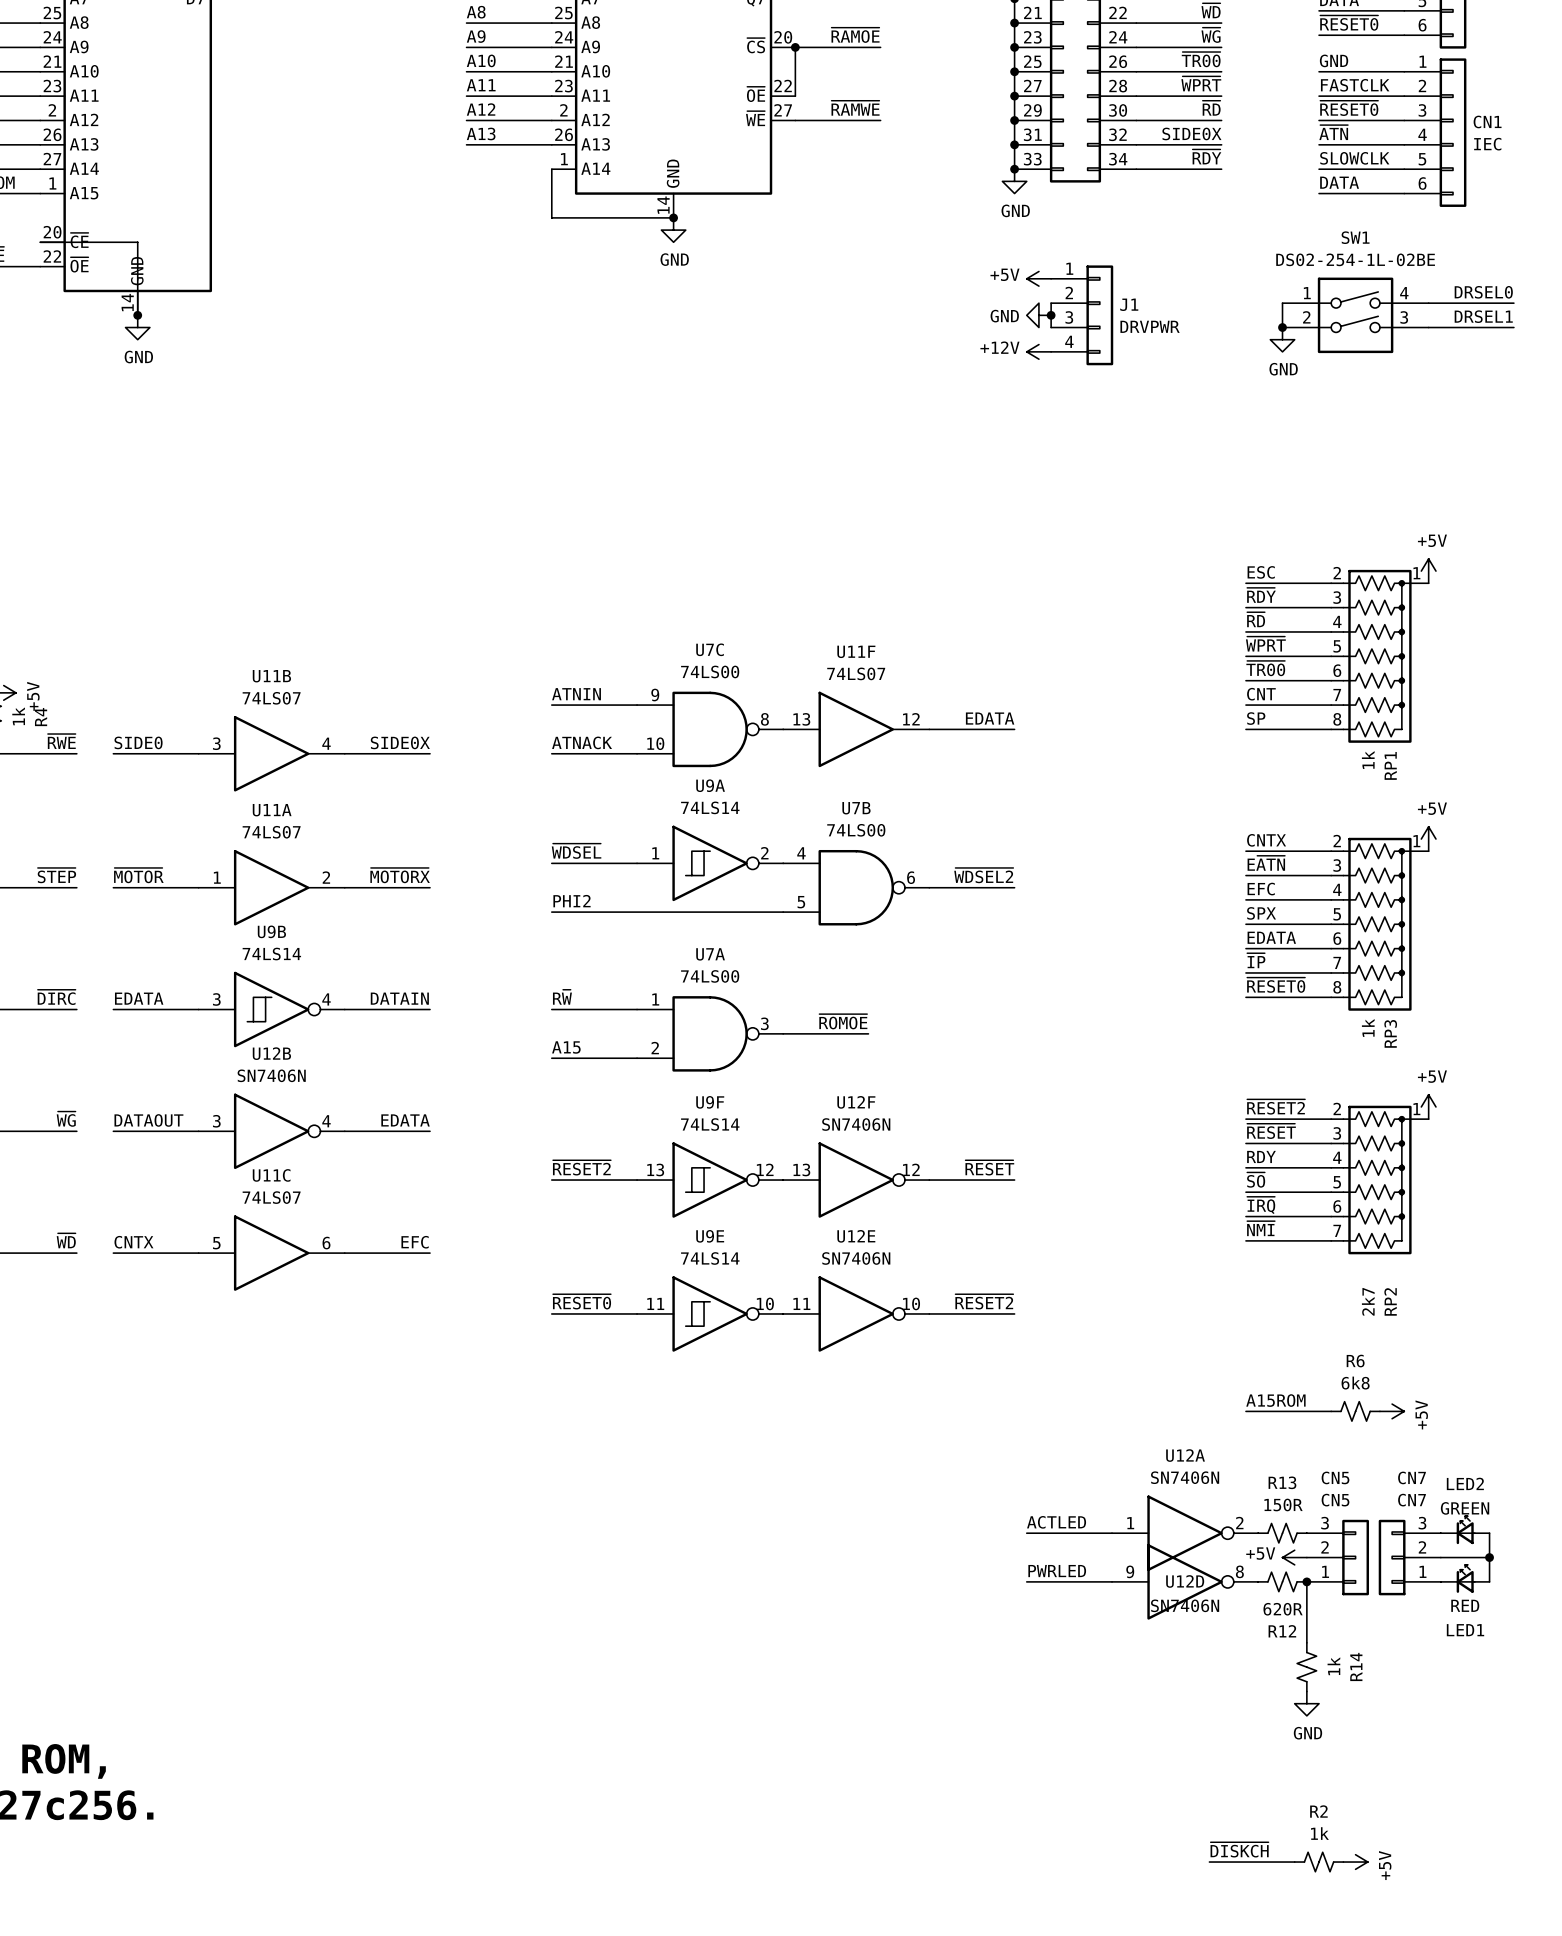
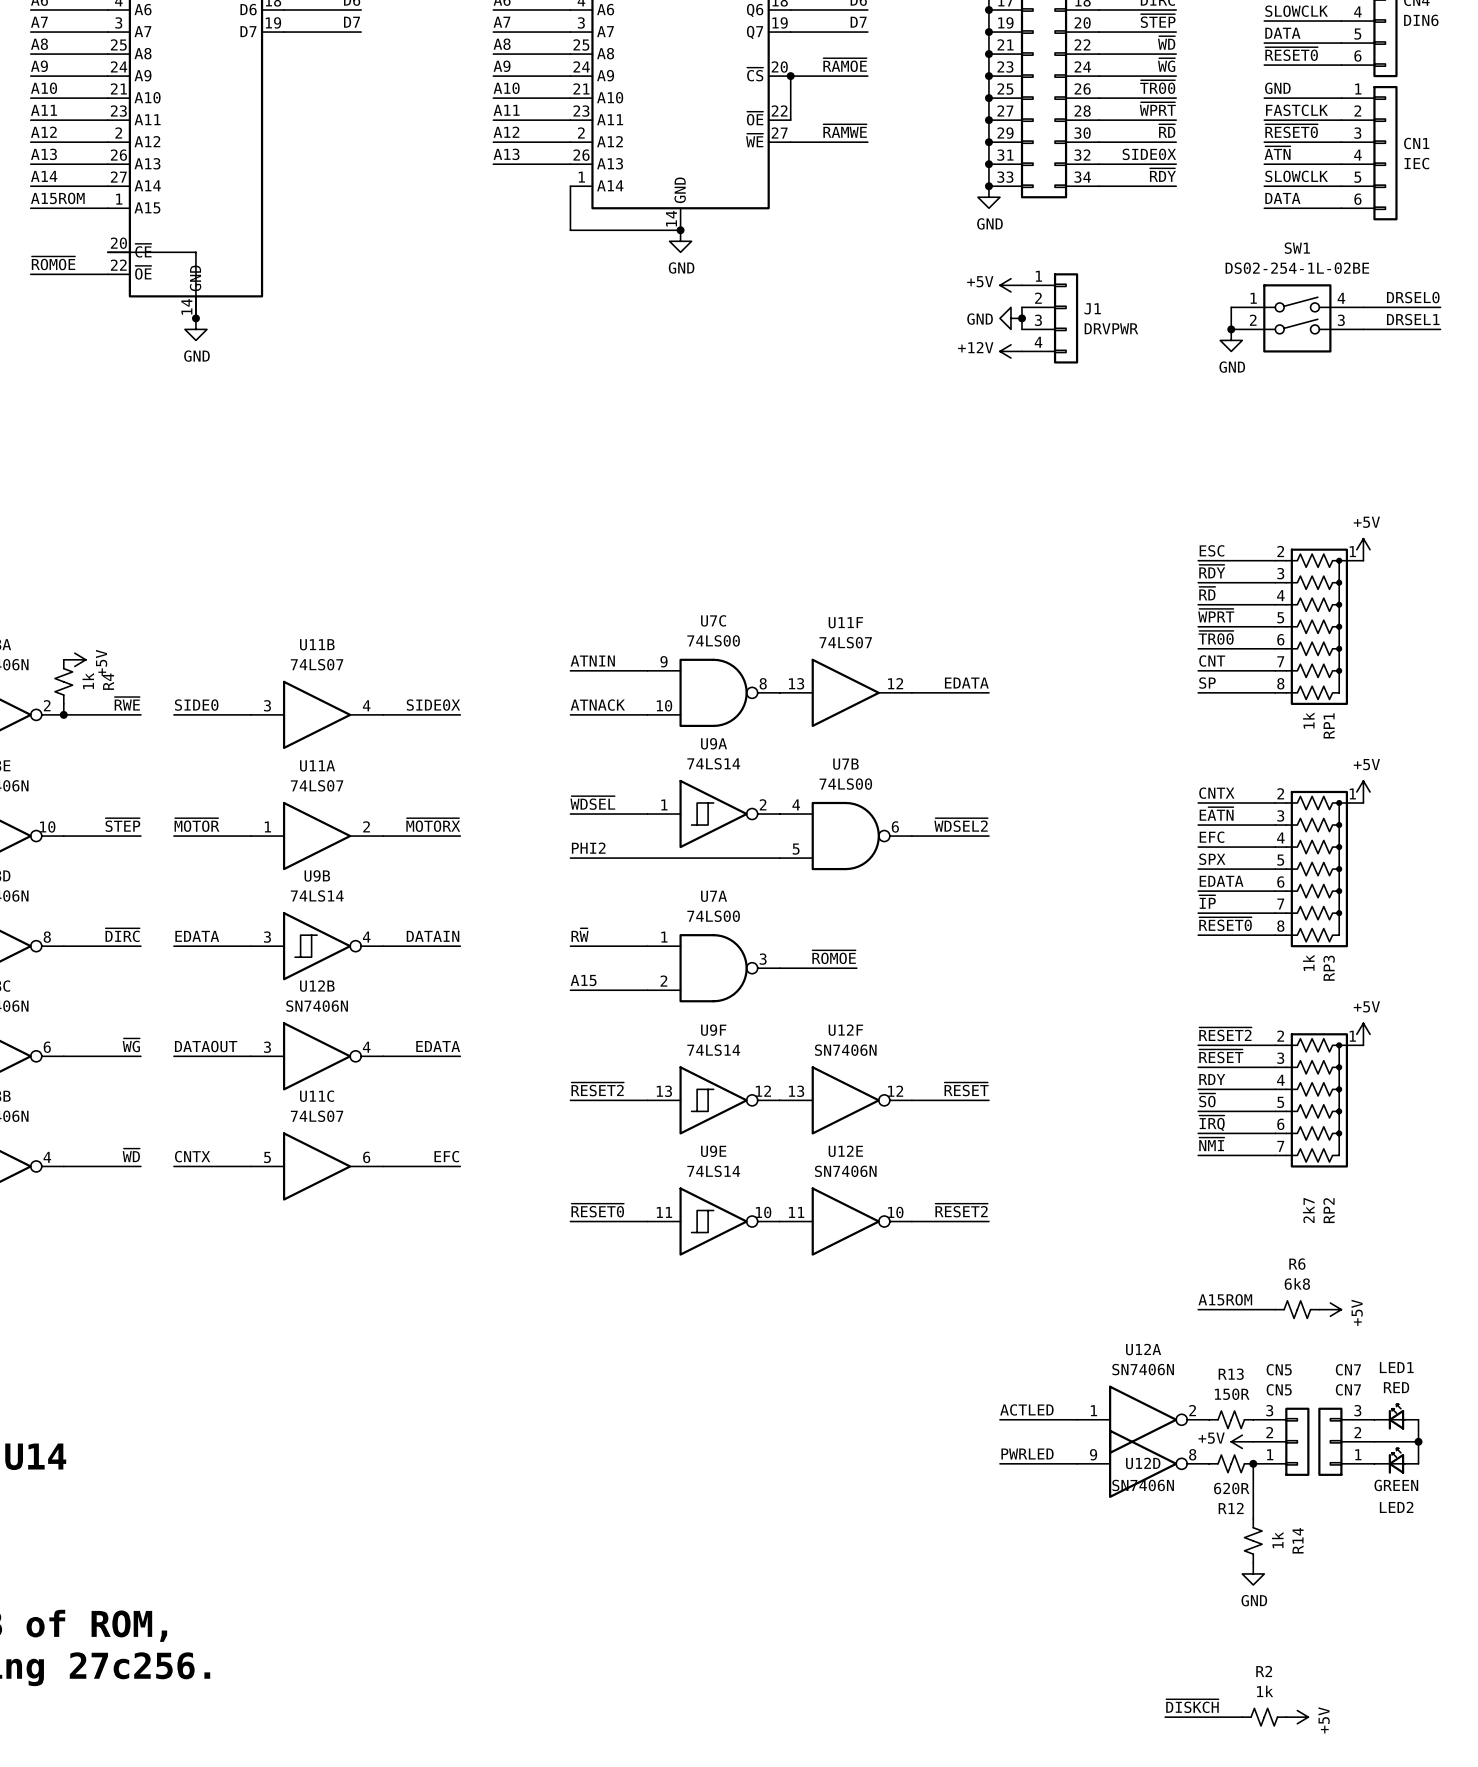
LED2 name: LED2 (1465, 1483) -> LED1 (1396, 1367)
LED2 value: GREEN (1465, 1508) -> RED (1396, 1387)
LED1 value: RED (1465, 1605) -> GREEN (1396, 1485)
LED1 name: LED1 (1465, 1630) -> LED2 (1396, 1507)

